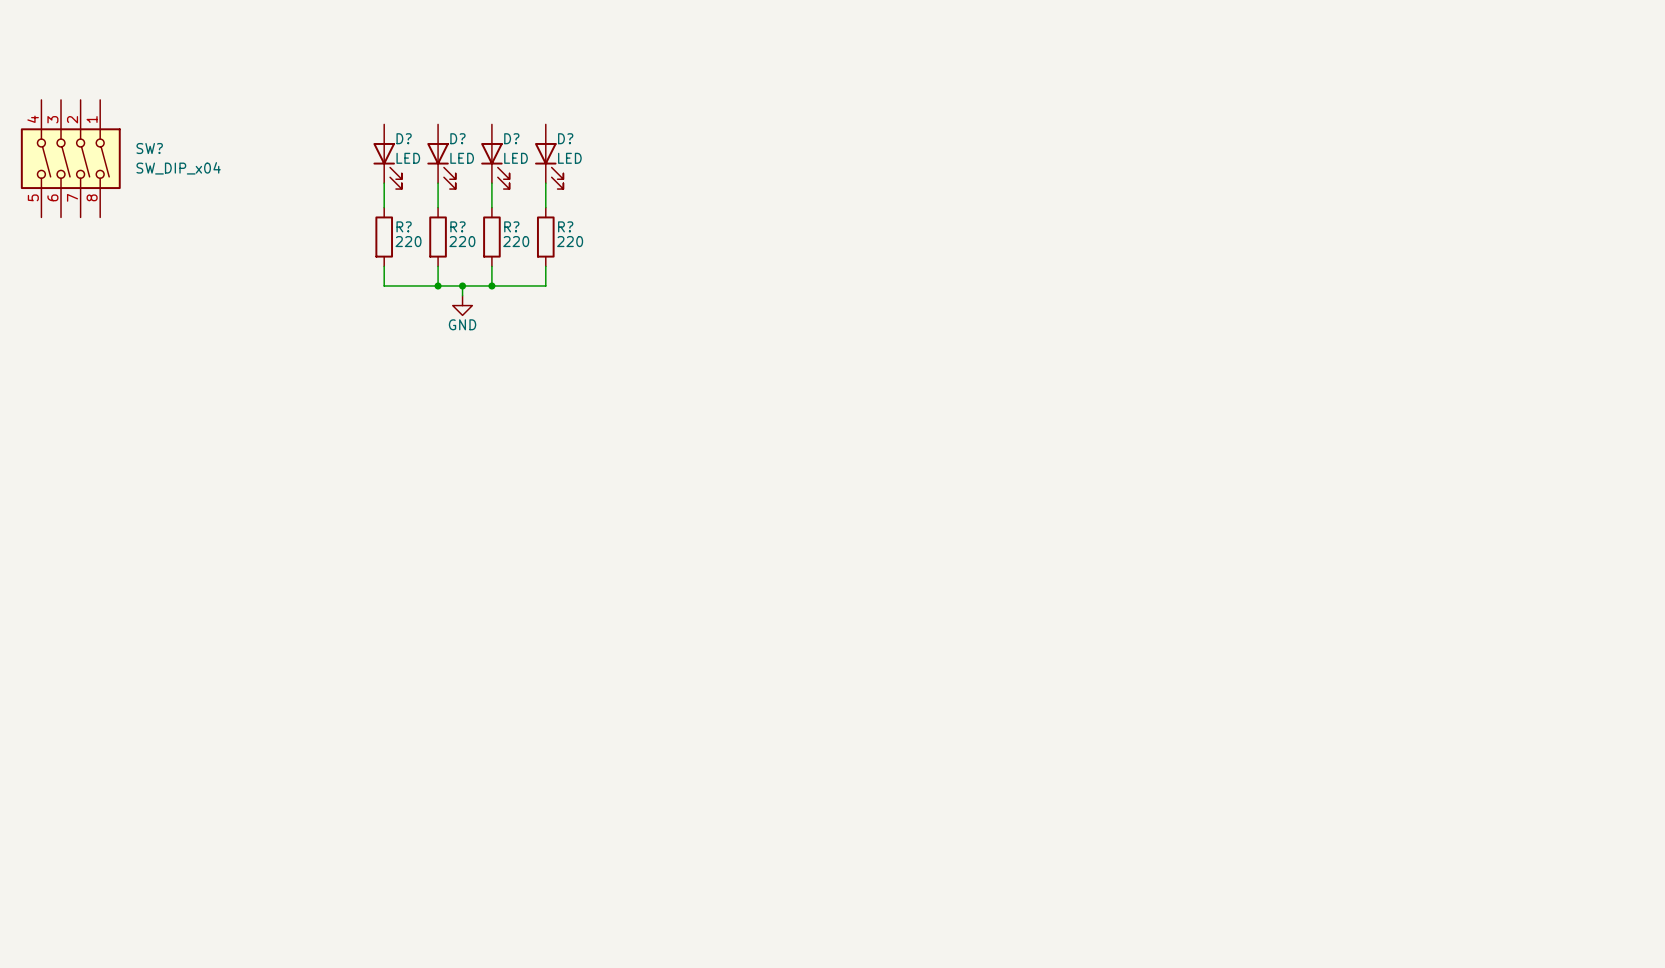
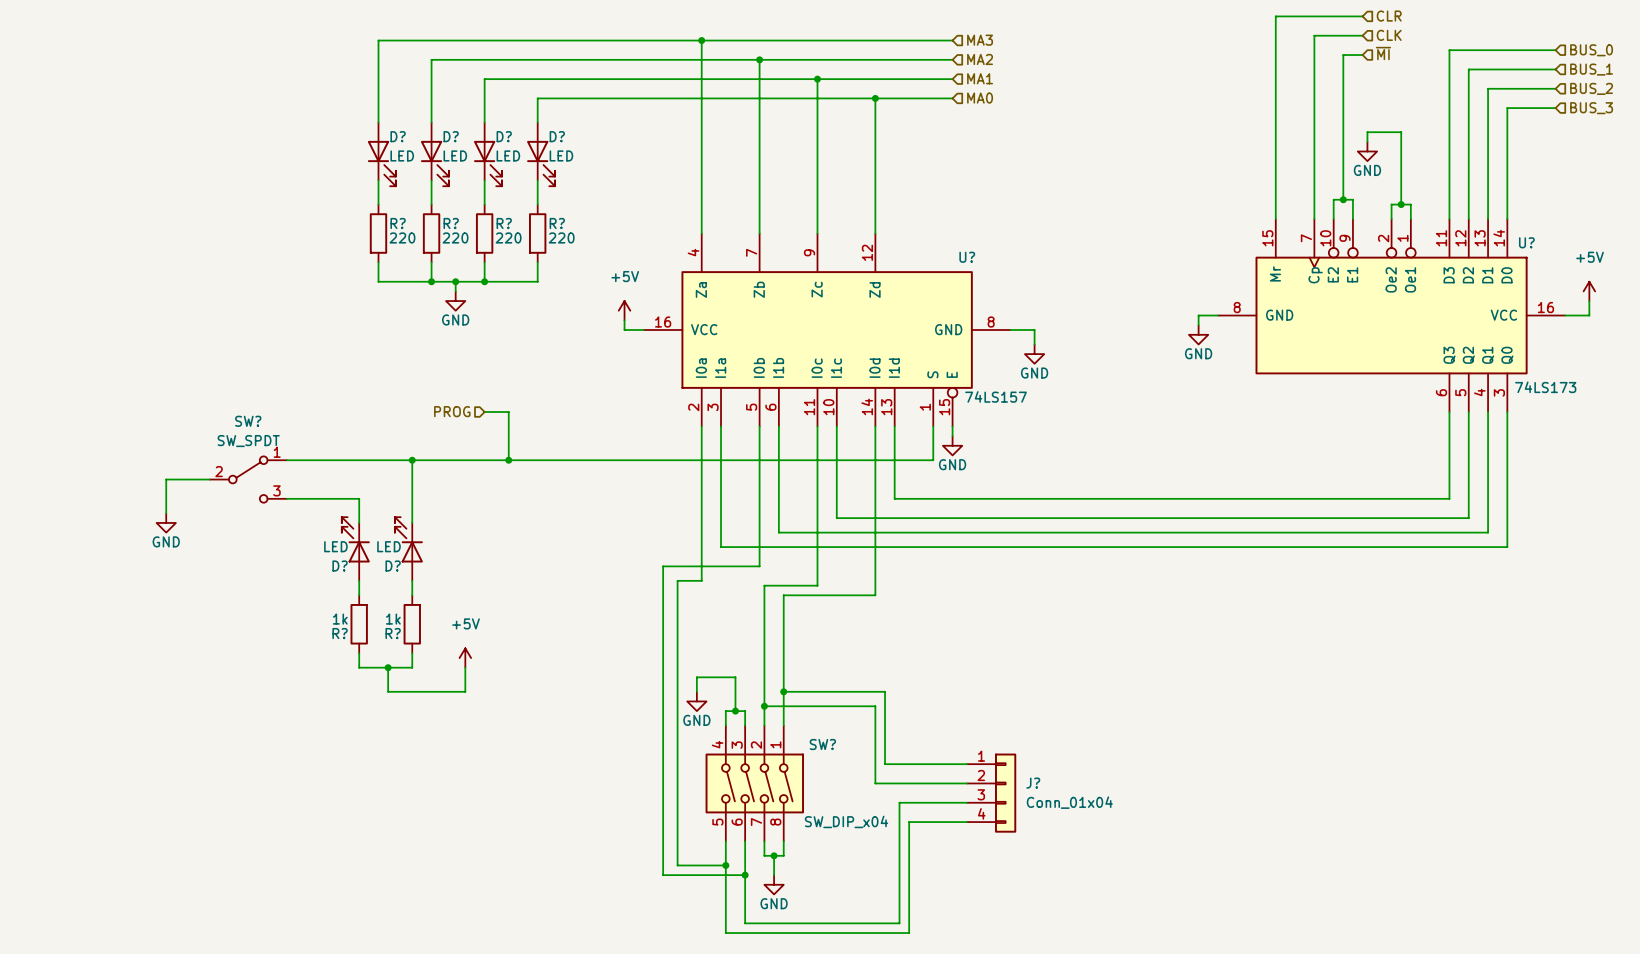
wire: none -> (1362, 16) (1275, 16) (1275, 219)
hierarchical label: none -> CLR (1389, 16)
hierarchical label: none -> CLK (1389, 35)
wire: none -> (1362, 35) (1314, 35) (1314, 219)
hierarchical label: none -> MA3 (980, 40)
wire: none -> (701, 40) (701, 233)
junction: none -> (701, 40)
wire: none -> (952, 40) (378, 40) (378, 122)
wire: none -> (1555, 50) (1449, 50) (1449, 219)
hierarchical label: none -> BUS_0 (1591, 50)
hierarchical label: none -> ~{MI} (1383, 53)
wire: none -> (1362, 55) (1343, 55) (1343, 199)
wire: none -> (759, 59) (759, 233)
junction: none -> (759, 59)
wire: none -> (952, 59) (431, 59) (431, 122)
hierarchical label: none -> MA2 (980, 59)
wire: none -> (1555, 69) (1468, 69) (1468, 219)
hierarchical label: none -> BUS_1 (1591, 69)
hierarchical label: none -> MA1 (980, 78)
wire: none -> (817, 79) (817, 233)
junction: none -> (817, 79)
wire: none -> (952, 79) (484, 79) (484, 122)
wire: none -> (1555, 88) (1488, 88) (1488, 219)
hierarchical label: none -> BUS_2 (1591, 88)
wire: none -> (875, 98) (875, 233)
junction: none -> (875, 98)
wire: none -> (952, 98) (537, 98) (537, 122)
hierarchical label: none -> MA0 (980, 98)
wire: none -> (1555, 108) (1507, 108) (1507, 219)
hierarchical label: none -> BUS_3 (1591, 108)
wire: none -> (1367, 141) (1367, 132) (1401, 132) (1401, 204)
power symbol: none -> GND (1367, 151)
SW?: SW_DIP_x04 (70, 158) -> none
junction: none -> (1343, 199)
junction: none -> (1401, 204)
wire: none -> (1333, 219) (1333, 199) (1352, 199) (1352, 219)
wire: none -> (1391, 219) (1391, 204) (1410, 204) (1410, 219)
power symbol: none -> +5V (1589, 291)
wire: none -> (1589, 301) (1589, 315) (1565, 315)
power symbol: none -> +5V (624, 310)
wire: none -> (1217, 315) (1198, 315) (1198, 325)
U?: none -> 74LS173 (1391, 315)
wire: none -> (624, 320) (624, 329) (643, 329)
U?: none -> 74LS157 (827, 329)
wire: none -> (1010, 329) (1034, 329) (1034, 344)
power symbol: none -> GND (1198, 334)
power symbol: none -> GND (1034, 354)
hierarchical label: none -> PROG (452, 411)
wire: none -> (484, 412) (508, 412) (508, 460)
wire: none -> (1449, 412) (1449, 498) (894, 498) (894, 426)
wire: none -> (1468, 412) (1468, 518) (836, 518) (836, 426)
wire: none -> (1488, 412) (1488, 532) (778, 532) (778, 426)
wire: none -> (1507, 412) (1507, 547) (721, 547) (721, 426)
wire: none -> (701, 426) (701, 580) (677, 580) (677, 865) (725, 865)
wire: none -> (759, 426) (759, 566) (663, 566) (663, 875) (745, 875)
wire: none -> (817, 426) (817, 585) (764, 585) (764, 725)
wire: none -> (875, 426) (875, 595) (783, 595) (783, 725)
wire: none -> (933, 426) (933, 460) (286, 460)
wire: none -> (952, 426) (952, 436)
power symbol: none -> GND (952, 445)
wire: none -> (412, 460) (412, 522)
junction: none -> (412, 460)
junction: none -> (508, 460)
wire: none -> (209, 479) (166, 479) (166, 513)
SW?: none -> SW_SPDT (248, 479)
wire: none -> (286, 498) (359, 498) (359, 522)
power symbol: none -> GND (166, 522)
D?: none -> LED (355, 549)
D?: none -> LED (408, 549)
wire: none -> (359, 580) (359, 595)
wire: none -> (412, 580) (412, 595)
R?: none -> 1k (359, 624)
R?: none -> 1k (412, 624)
wire: none -> (359, 653) (359, 667) (412, 667) (412, 653)
power symbol: none -> +5V (465, 658)
wire: none -> (388, 667) (388, 691) (465, 691) (465, 667)
junction: none -> (388, 667)
wire: none -> (696, 691) (696, 677) (735, 677) (735, 711)
wire: none -> (783, 691) (885, 691) (885, 764) (967, 764)
junction: none -> (783, 691)
power symbol: none -> GND (696, 701)
wire: none -> (764, 706) (875, 706) (875, 783) (967, 783)
junction: none -> (764, 706)
junction: none -> (735, 711)
wire: none -> (725, 725) (725, 711) (745, 711) (745, 725)
SW?: none -> SW_DIP_x04 (754, 783)
J?: none -> Conn_01x04 (991, 793)
wire: none -> (967, 802) (899, 802) (899, 923) (745, 923) (745, 841)
wire: none -> (967, 822) (909, 822) (909, 933) (725, 933) (725, 841)
wire: none -> (764, 841) (764, 855) (783, 855) (783, 841)
wire: none -> (774, 855) (774, 875)
junction: none -> (774, 855)
junction: none -> (725, 865)
junction: none -> (745, 875)
power symbol: none -> GND (774, 884)

